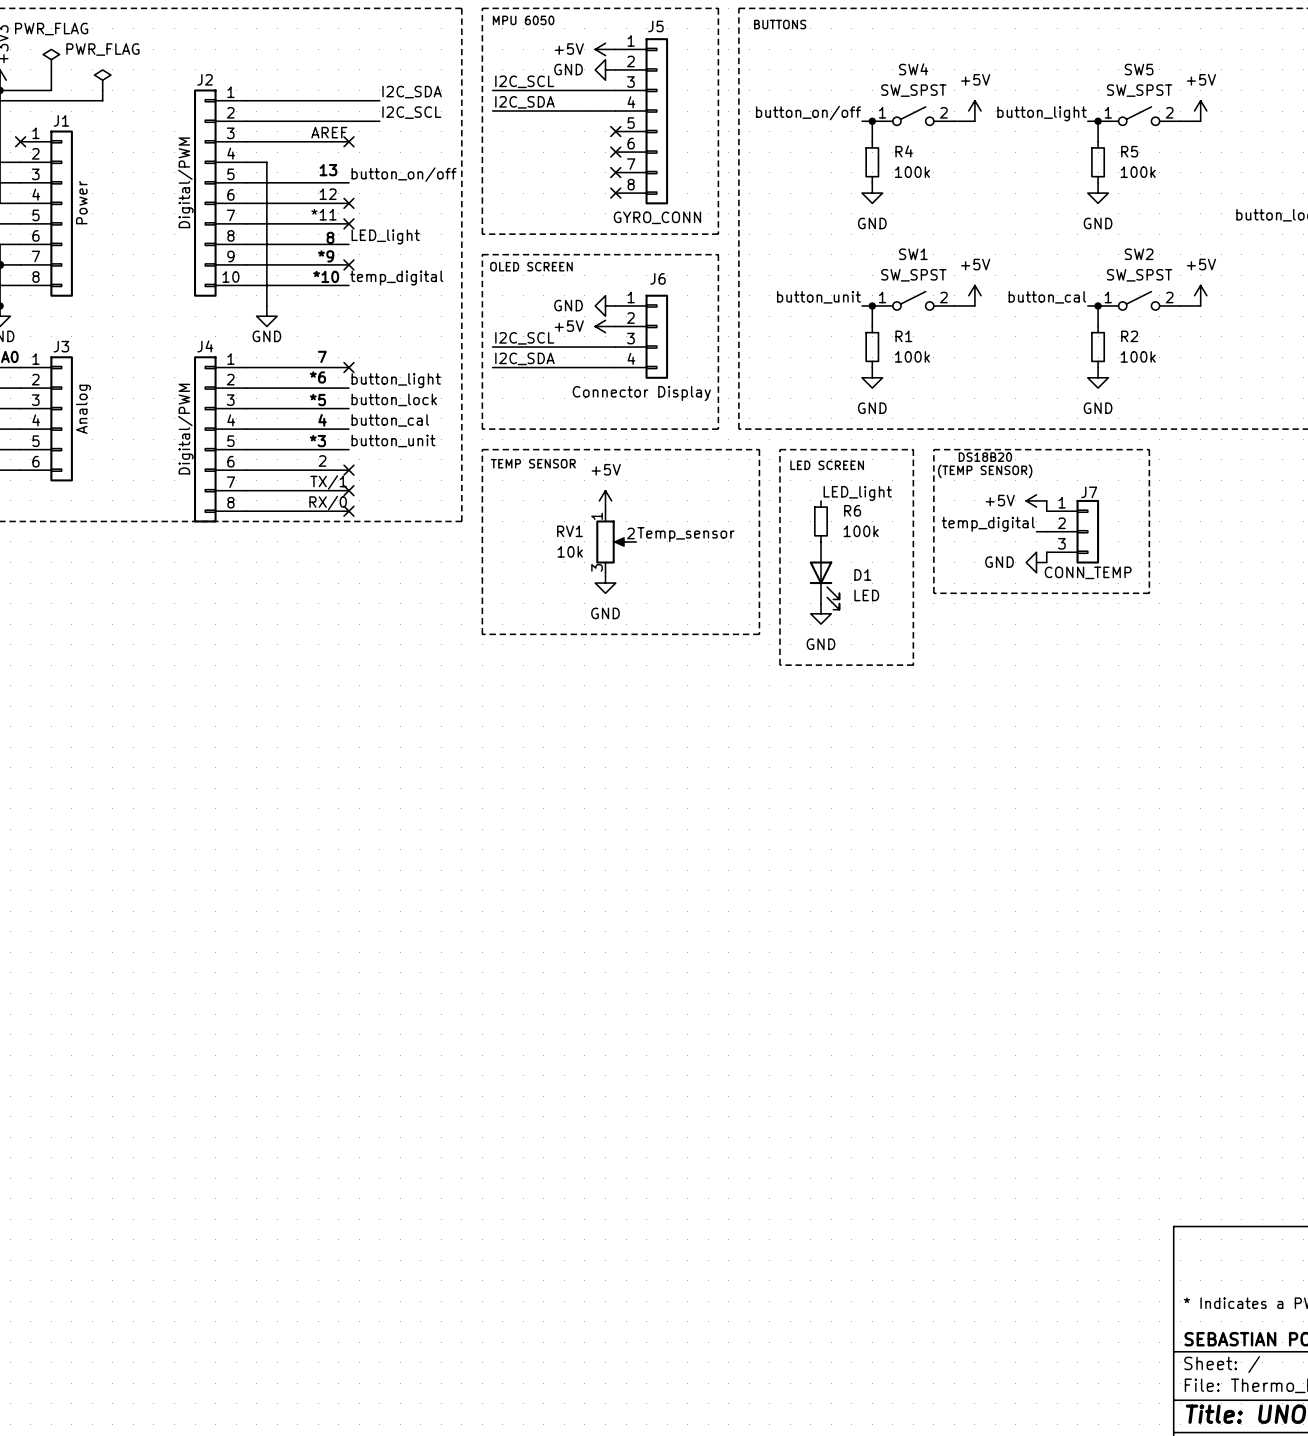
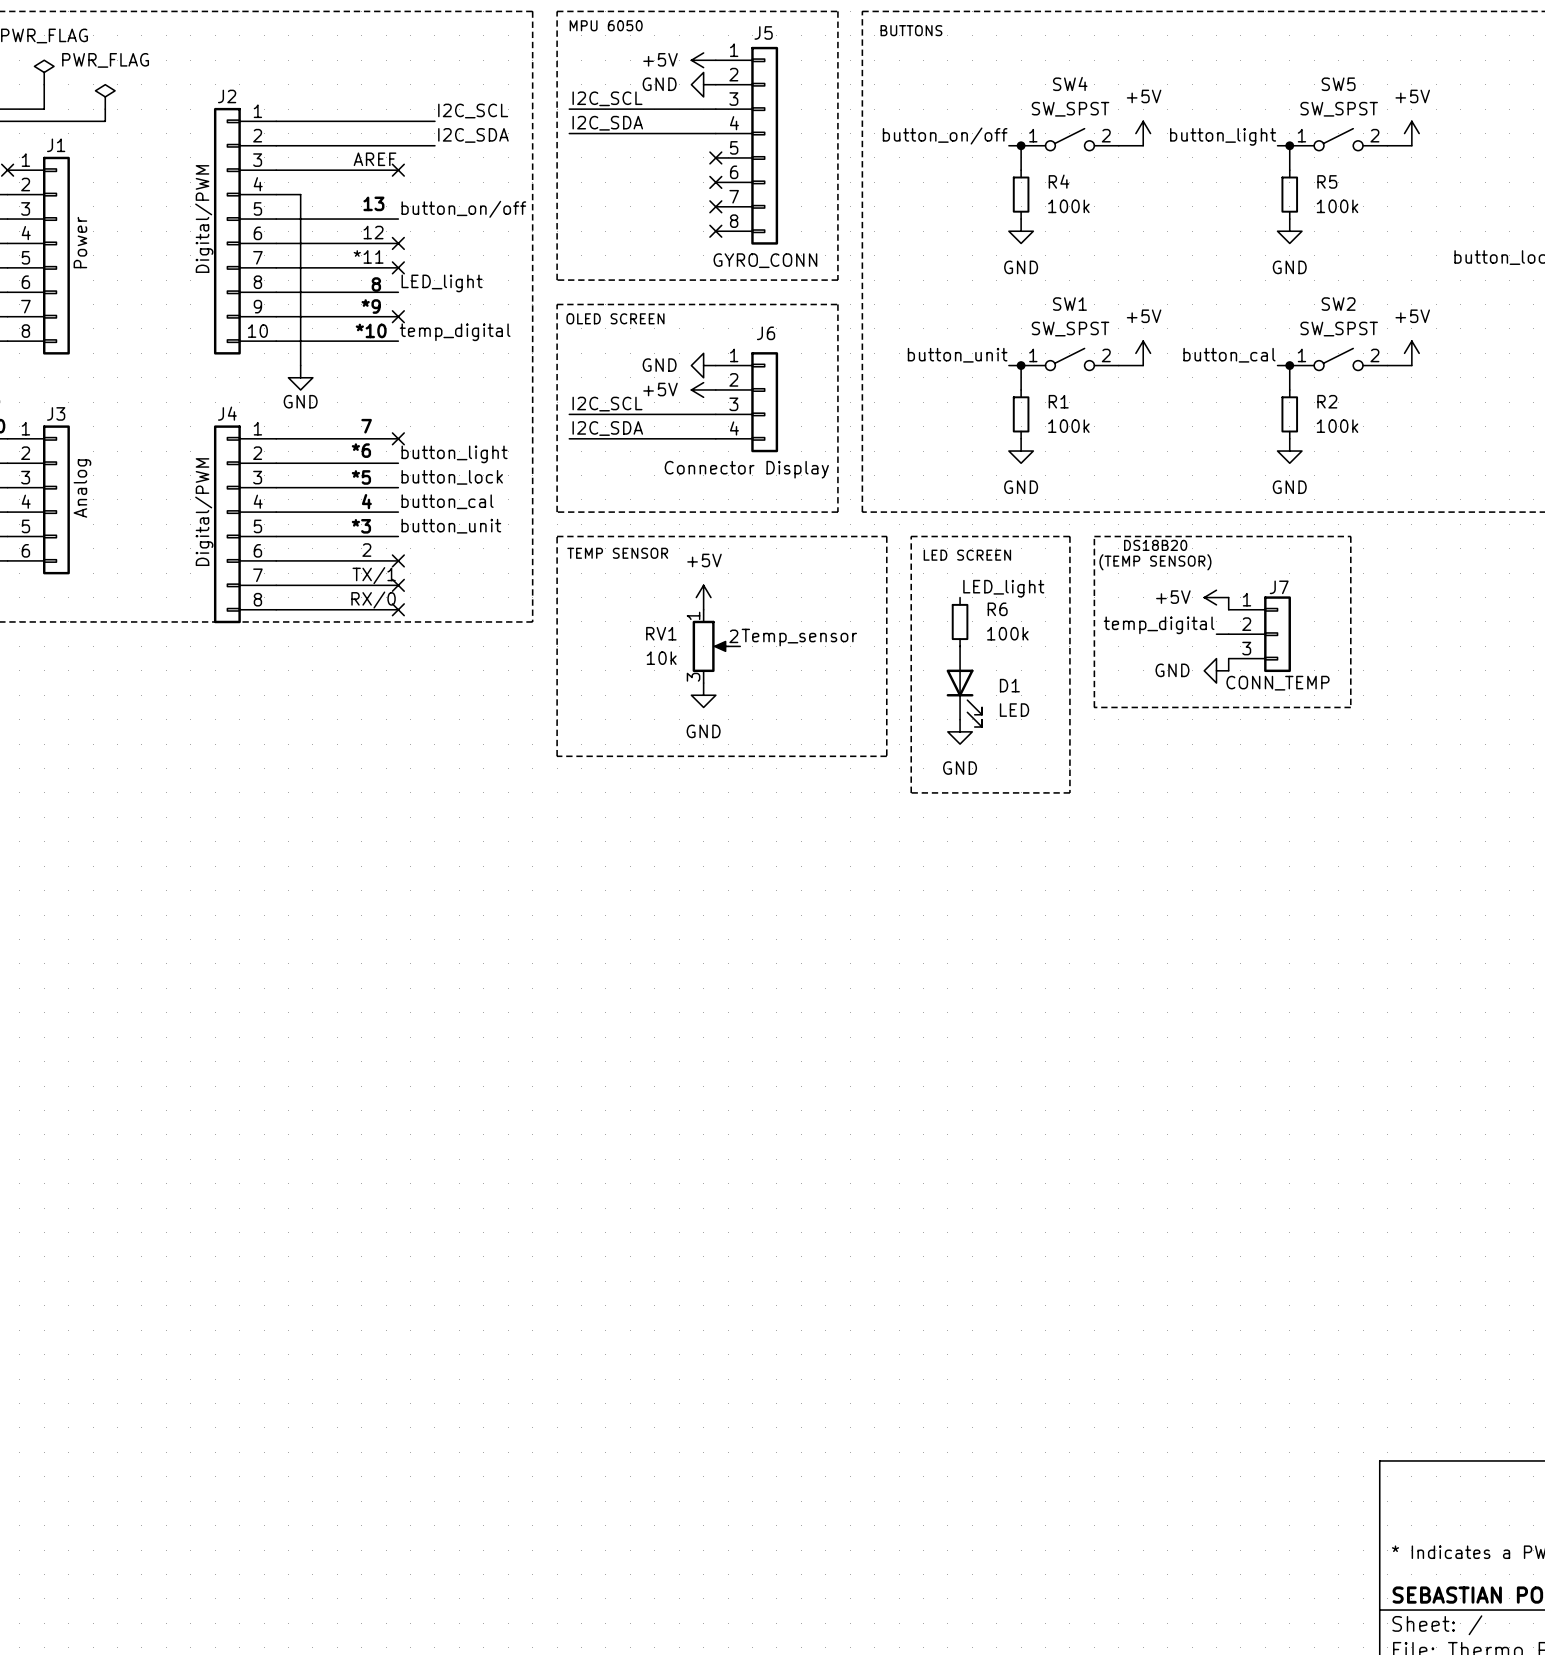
label: I2C_SDA (412, 92) -> I2C_SCL (473, 111)
label: I2C_SCL (411, 112) -> I2C_SDA (473, 135)

